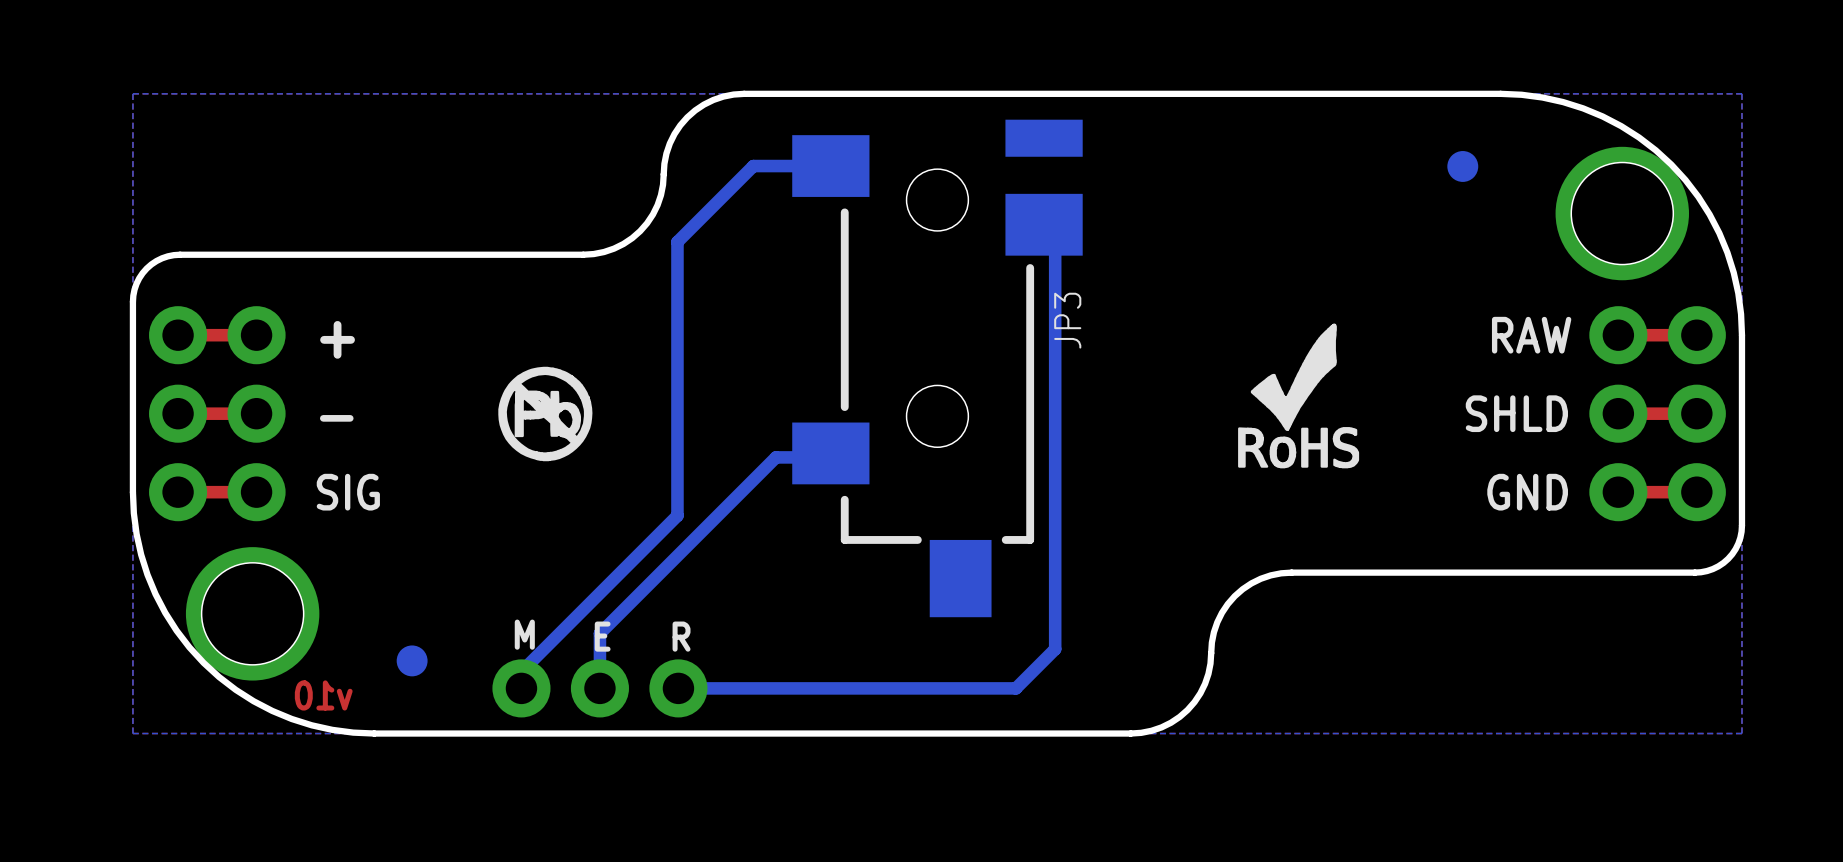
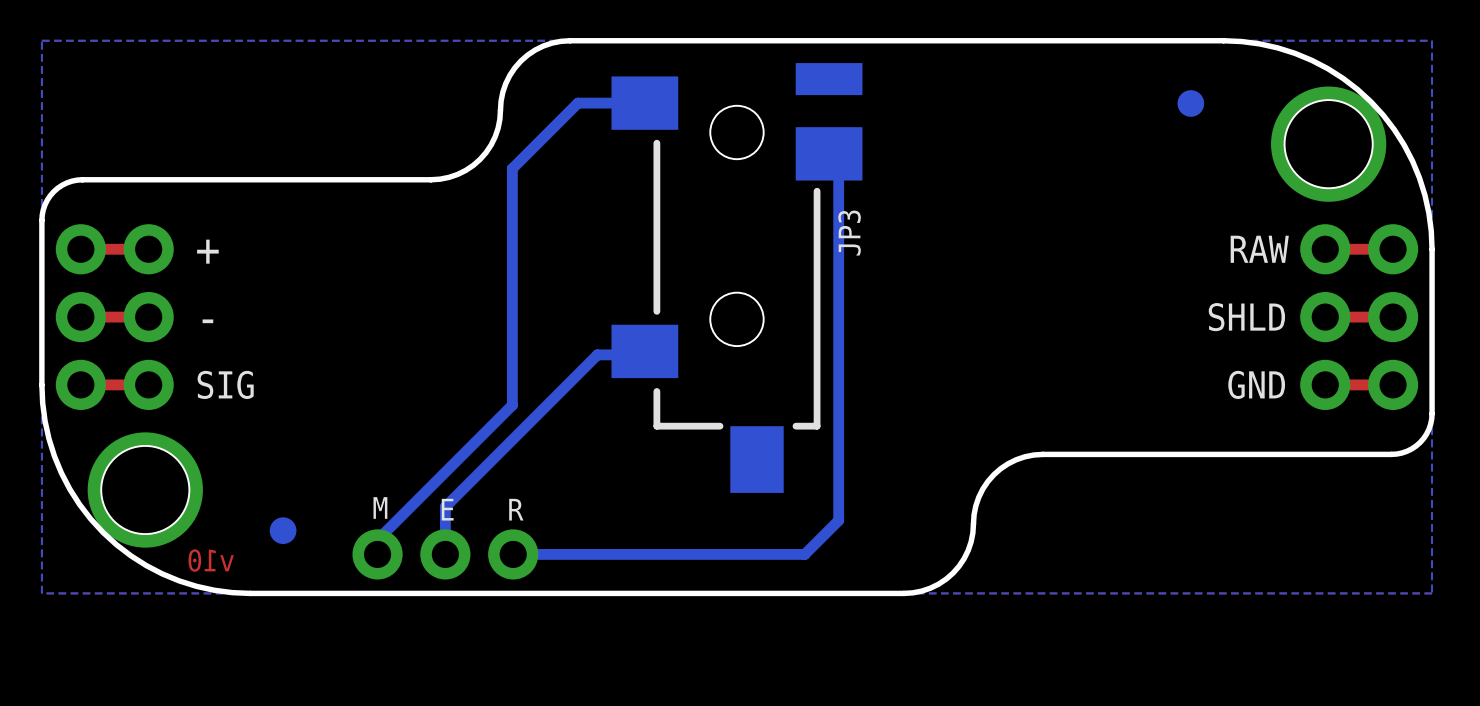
drawing: [1238, 323, 1360, 469] -> none
drawing: [498, 366, 593, 462] -> none

